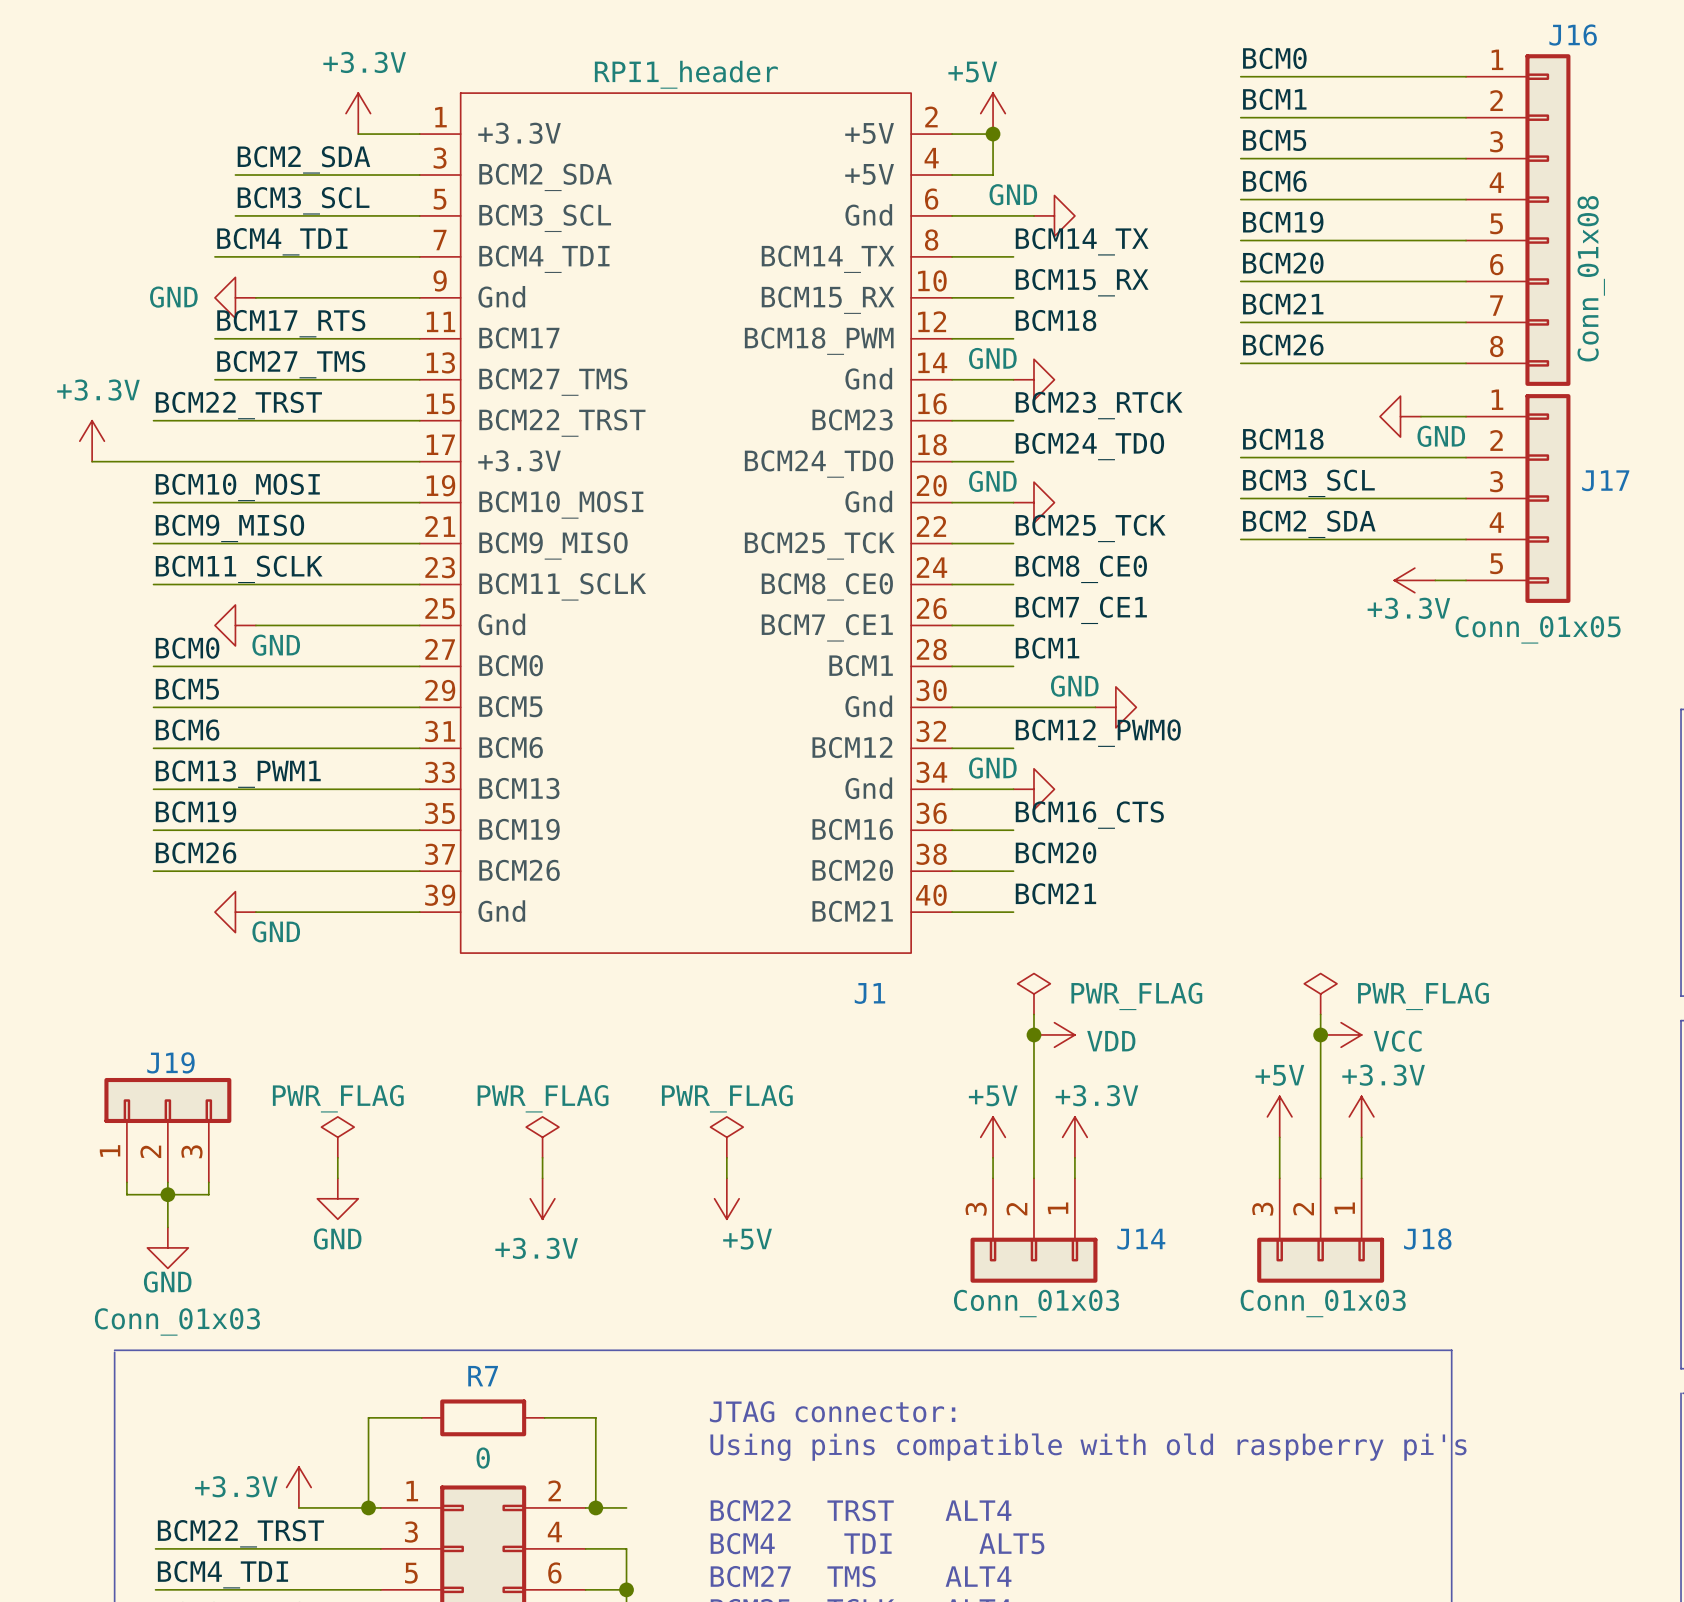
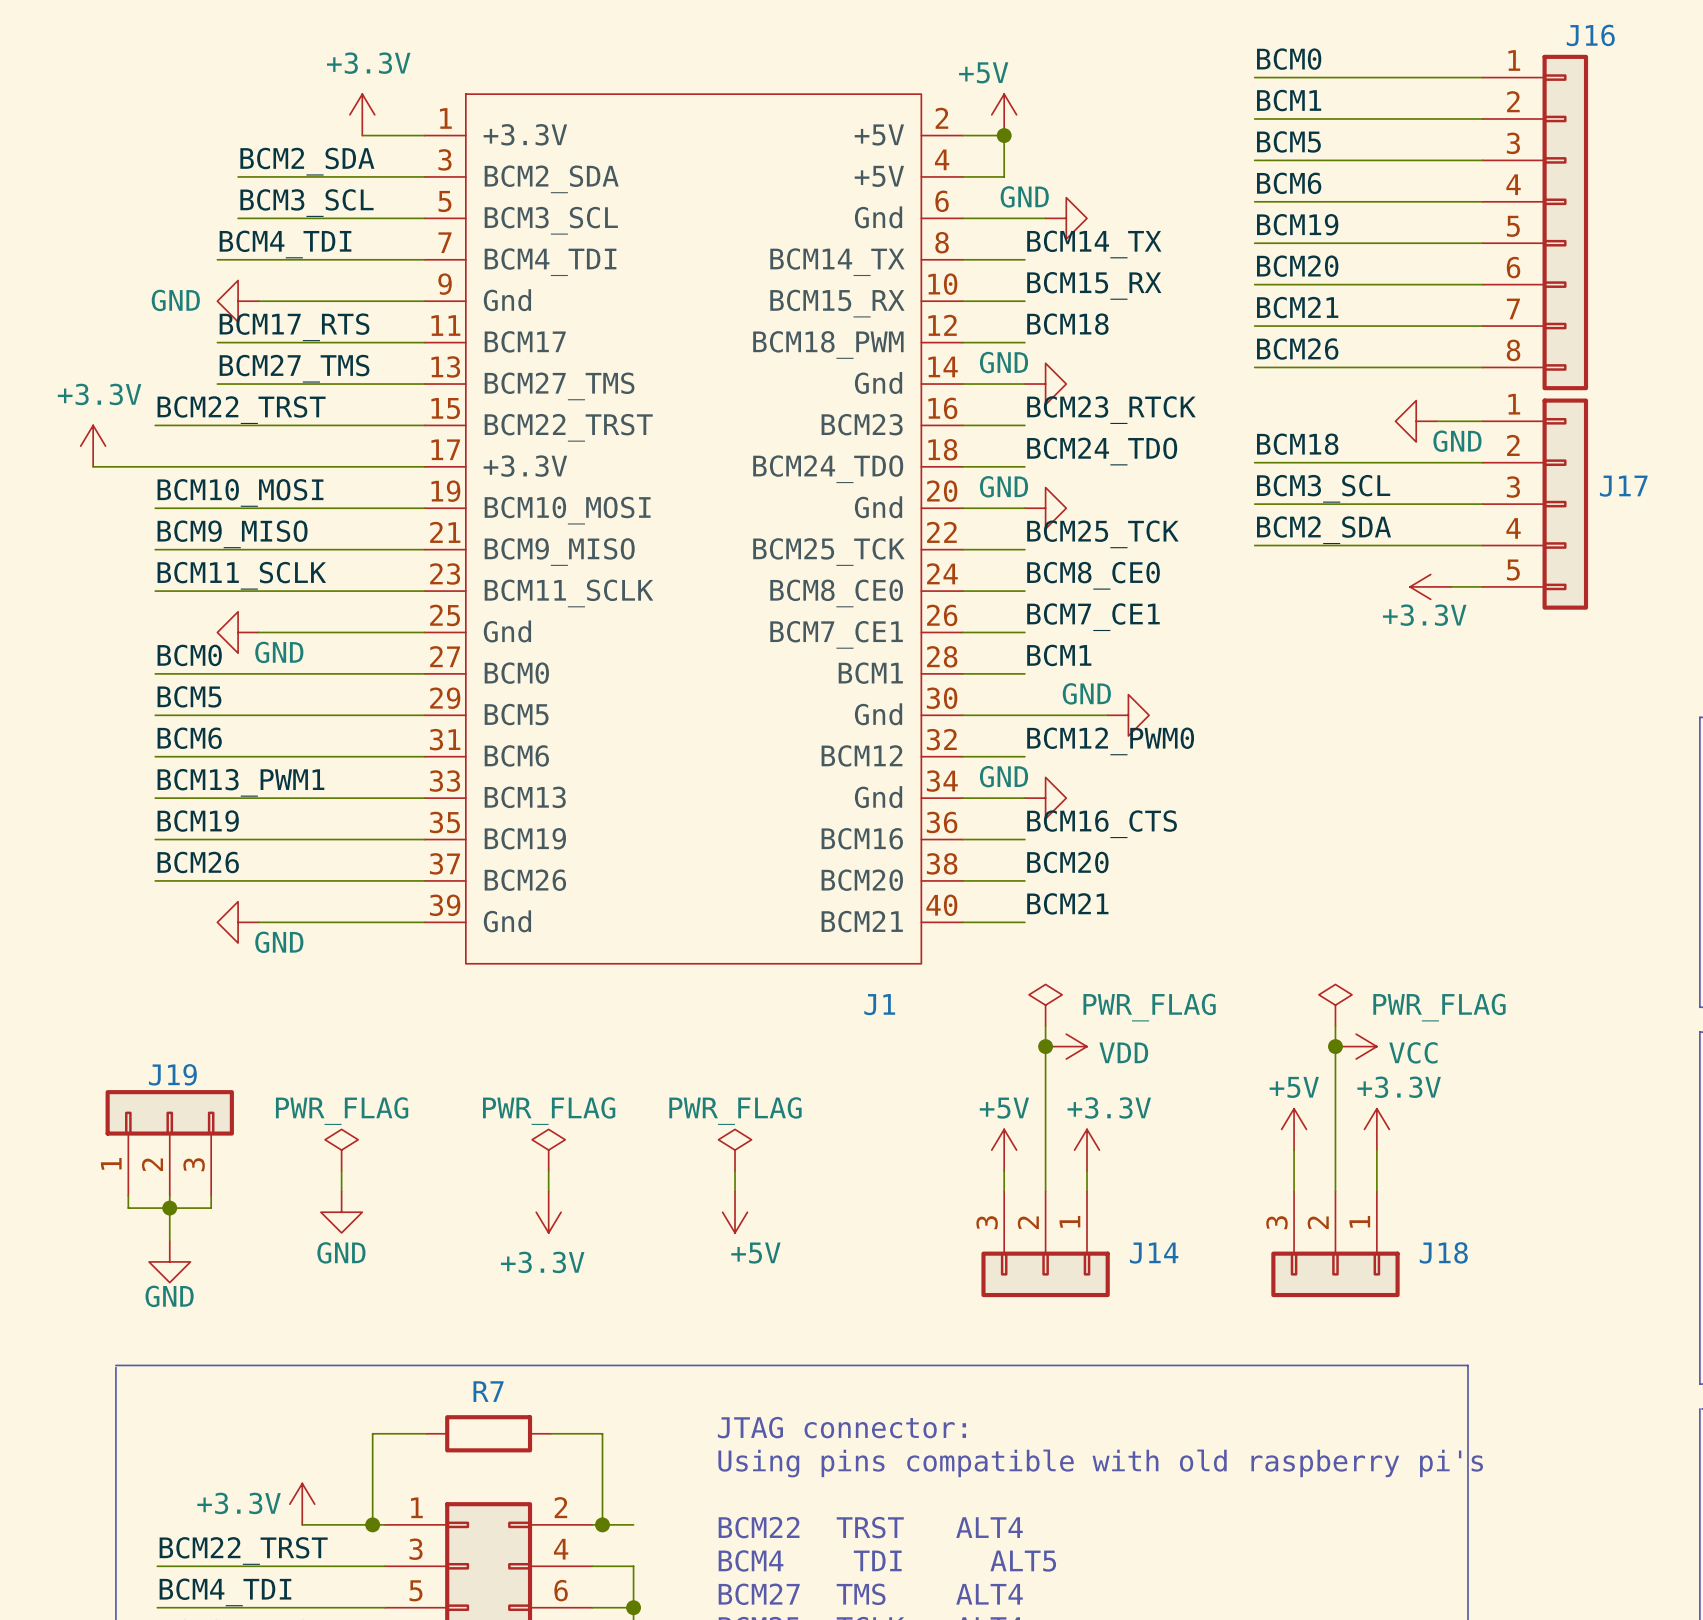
J1 value: RPI1_header (686, 74) -> none
J16 value: Conn_01x08 (1591, 278) -> none
J17 value: Conn_01x05 (1538, 629) -> none
J14 value: Conn_01x03 (1036, 1303) -> none
J18 value: Conn_01x03 (1323, 1303) -> none
J19 value: Conn_01x03 (177, 1321) -> none
R7 value: 0 (483, 1458) -> none

